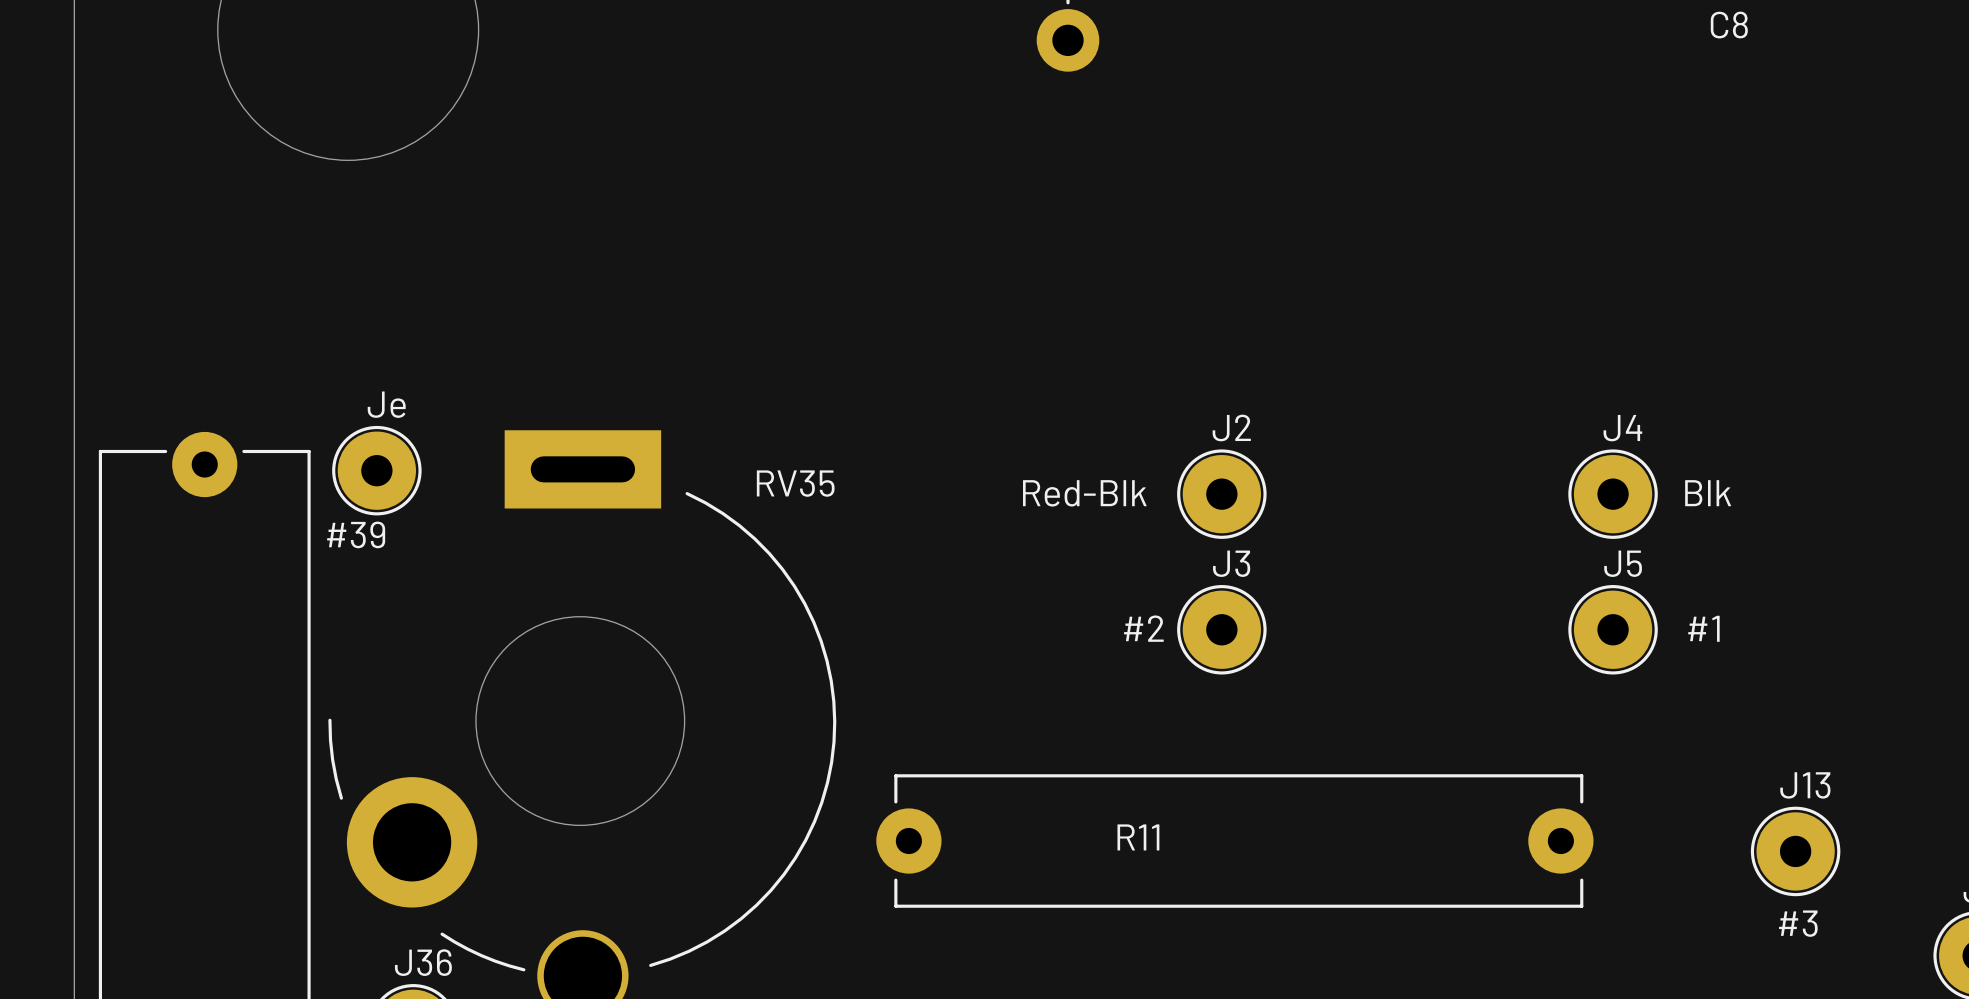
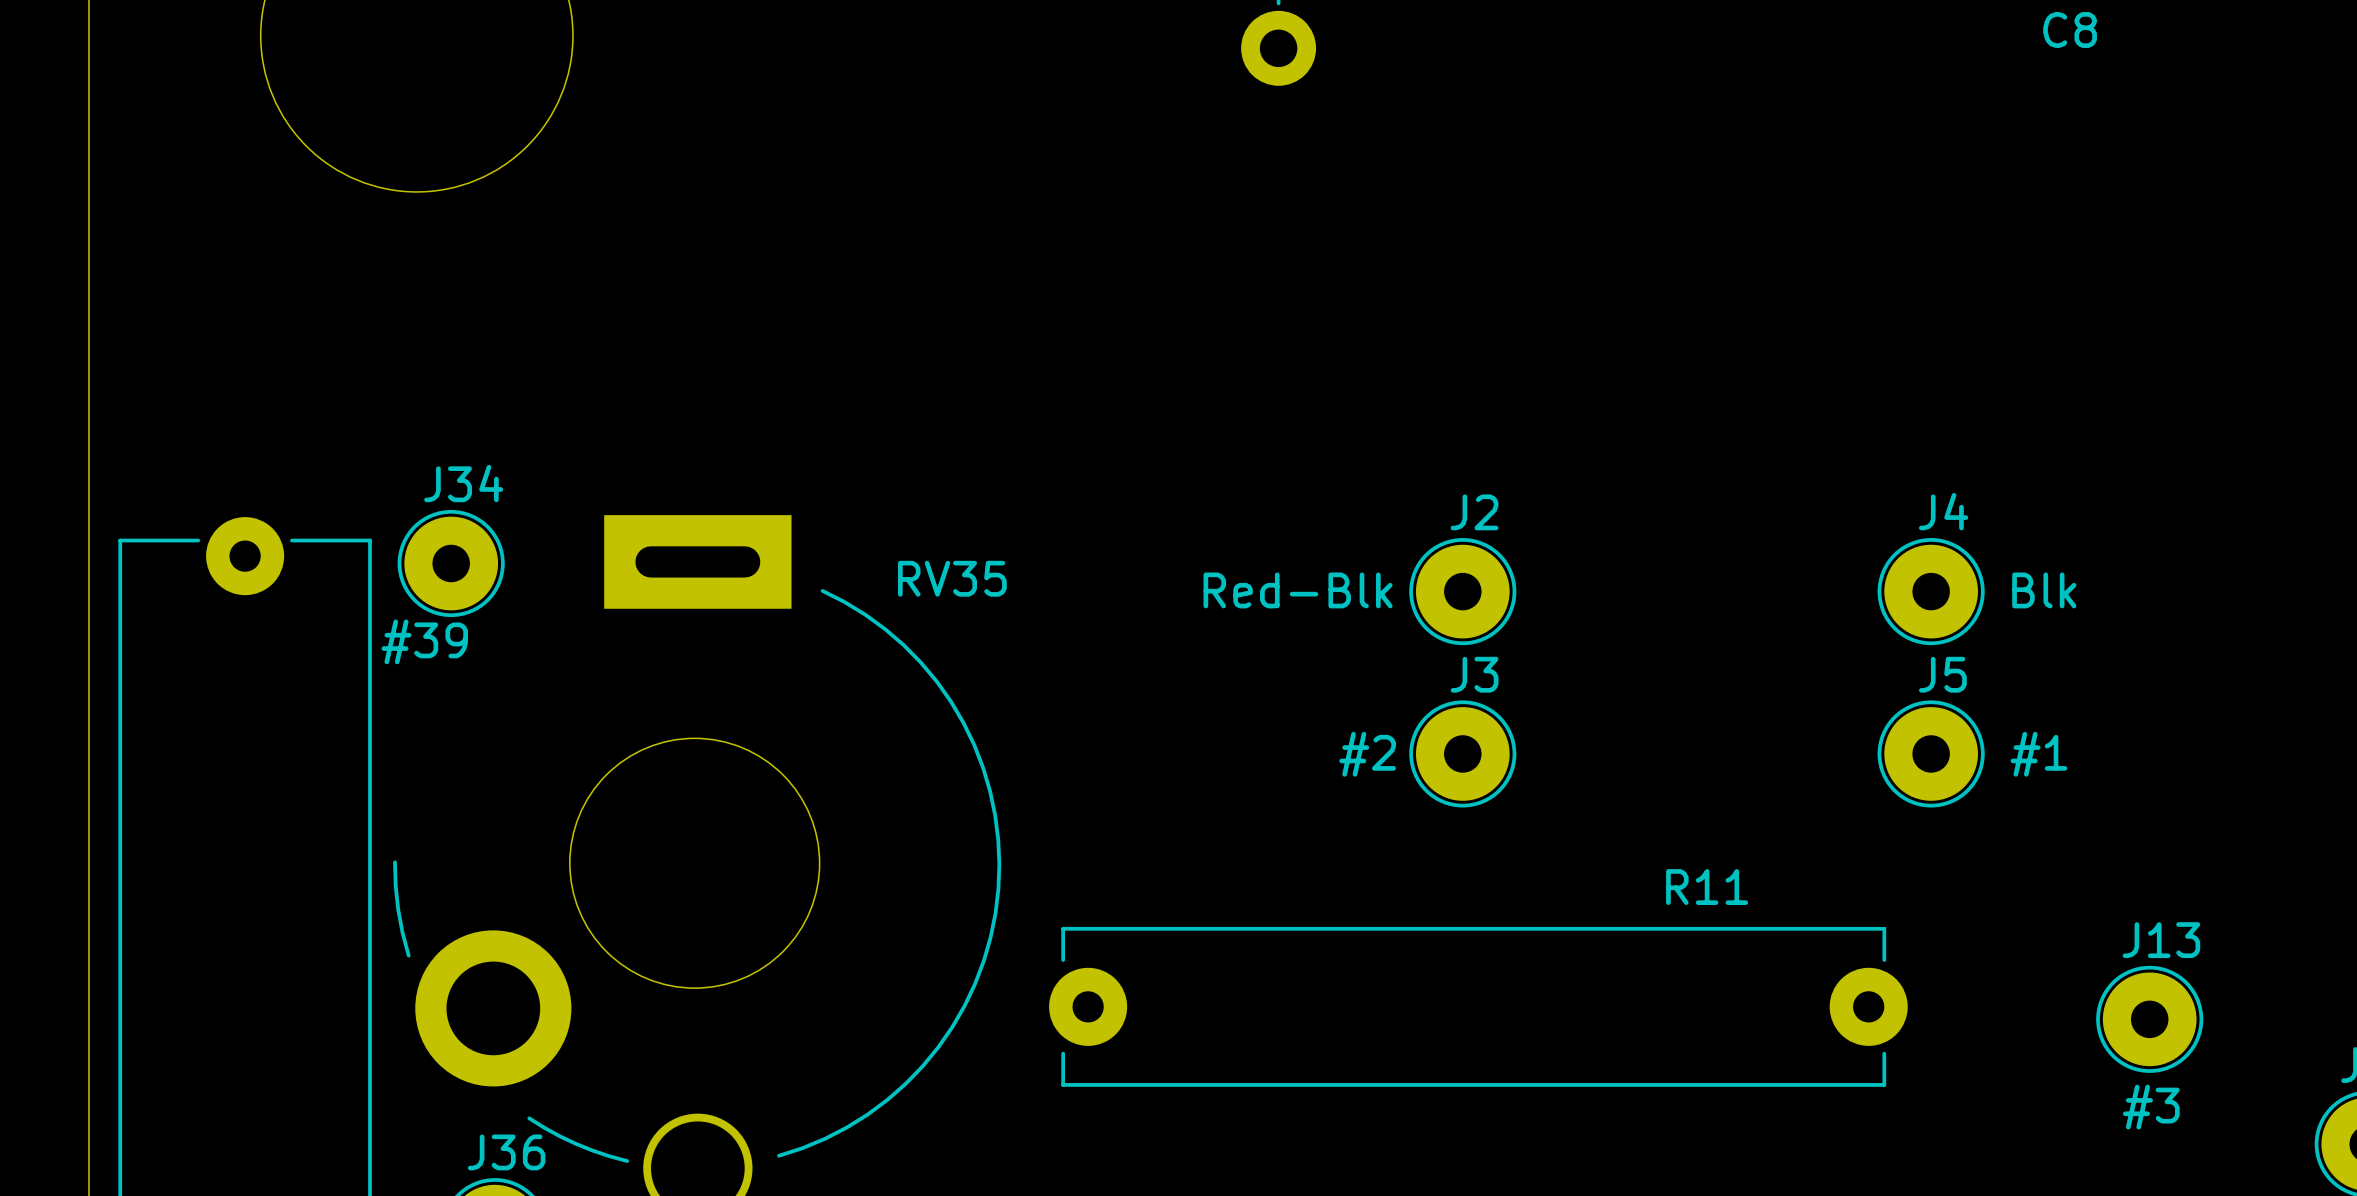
Je name: Je (386, 404) -> J34 (463, 483)
R11 name position: R11 (1138, 837) -> R11 (1707, 887)
R11 rotation: 0° (1234, 841) -> 180° (1478, 1006)

